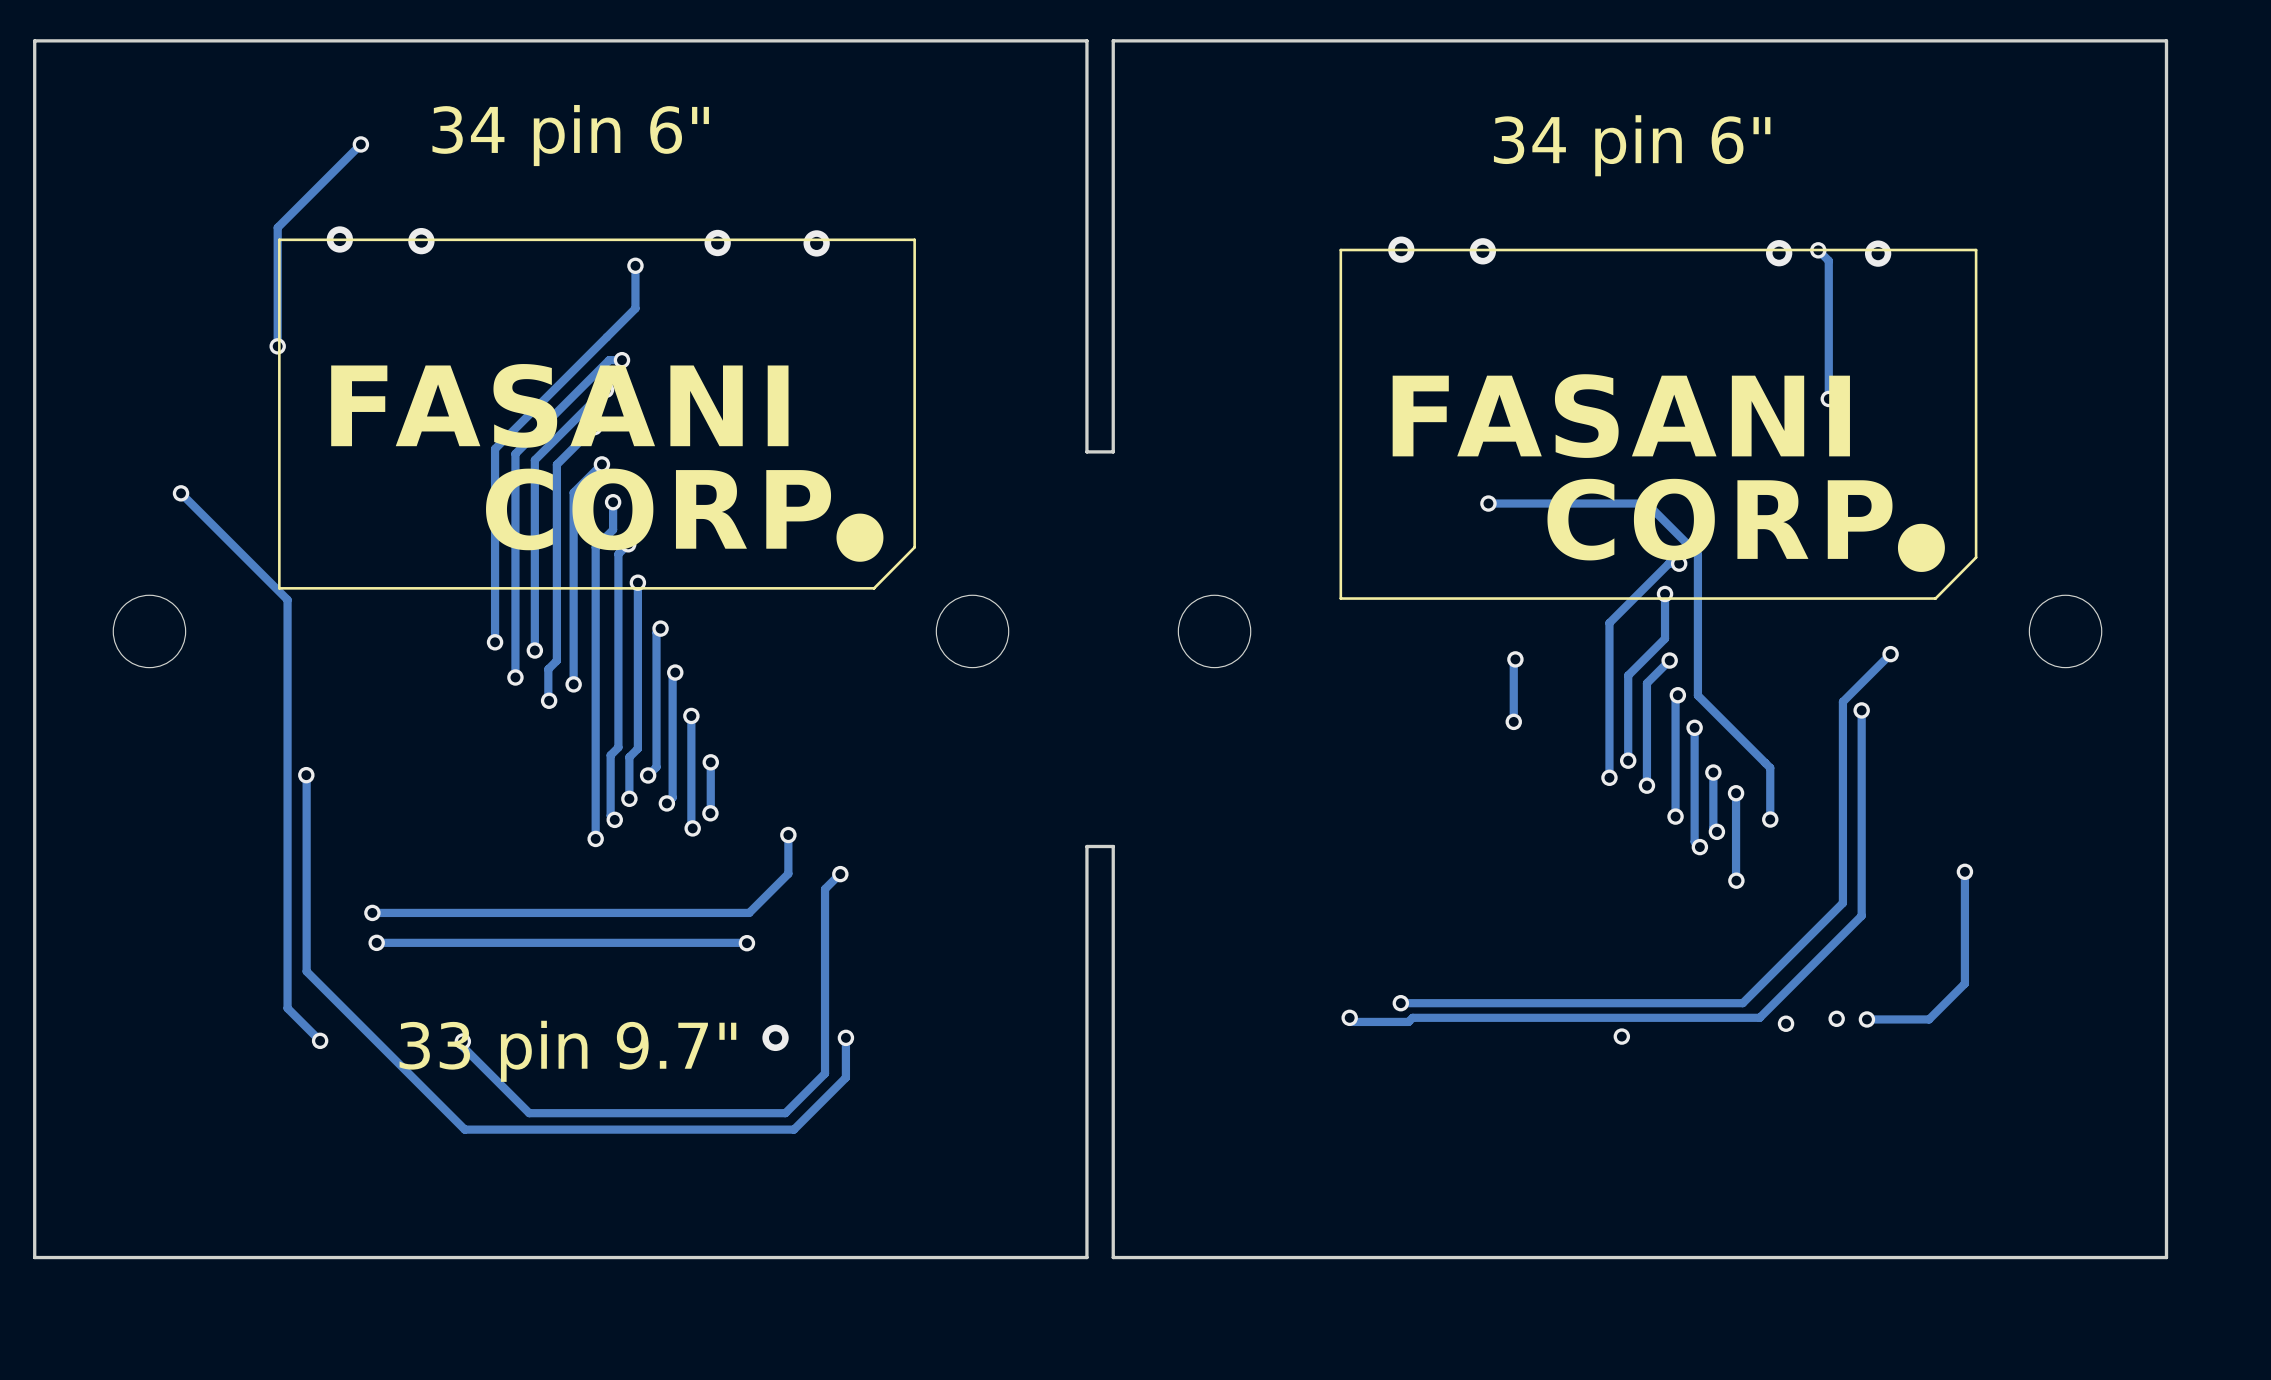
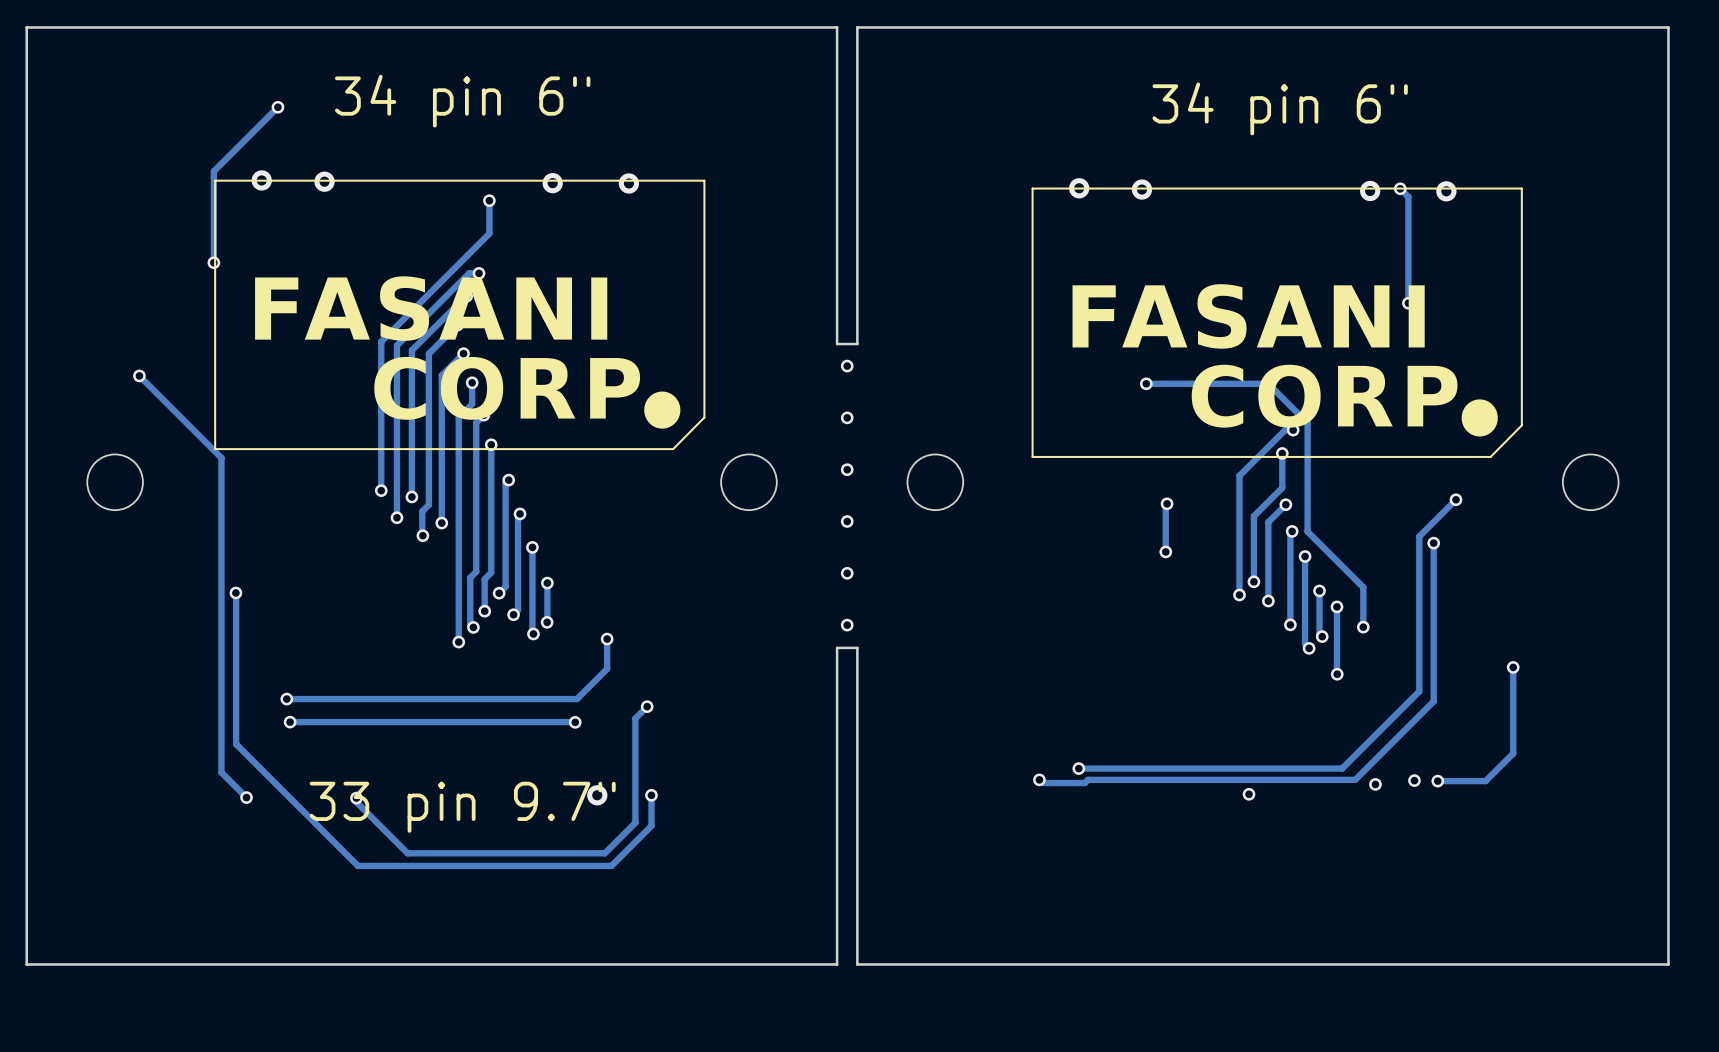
via: none -> (847, 366)
via: none -> (847, 417)
via: none -> (847, 469)
via: none -> (847, 521)
via: none -> (847, 573)
via: none -> (847, 625)
track: (840, 874) (825, 889) (825, 938) -> (647, 706) (635, 718)
via position: (840, 874) -> (647, 706)

